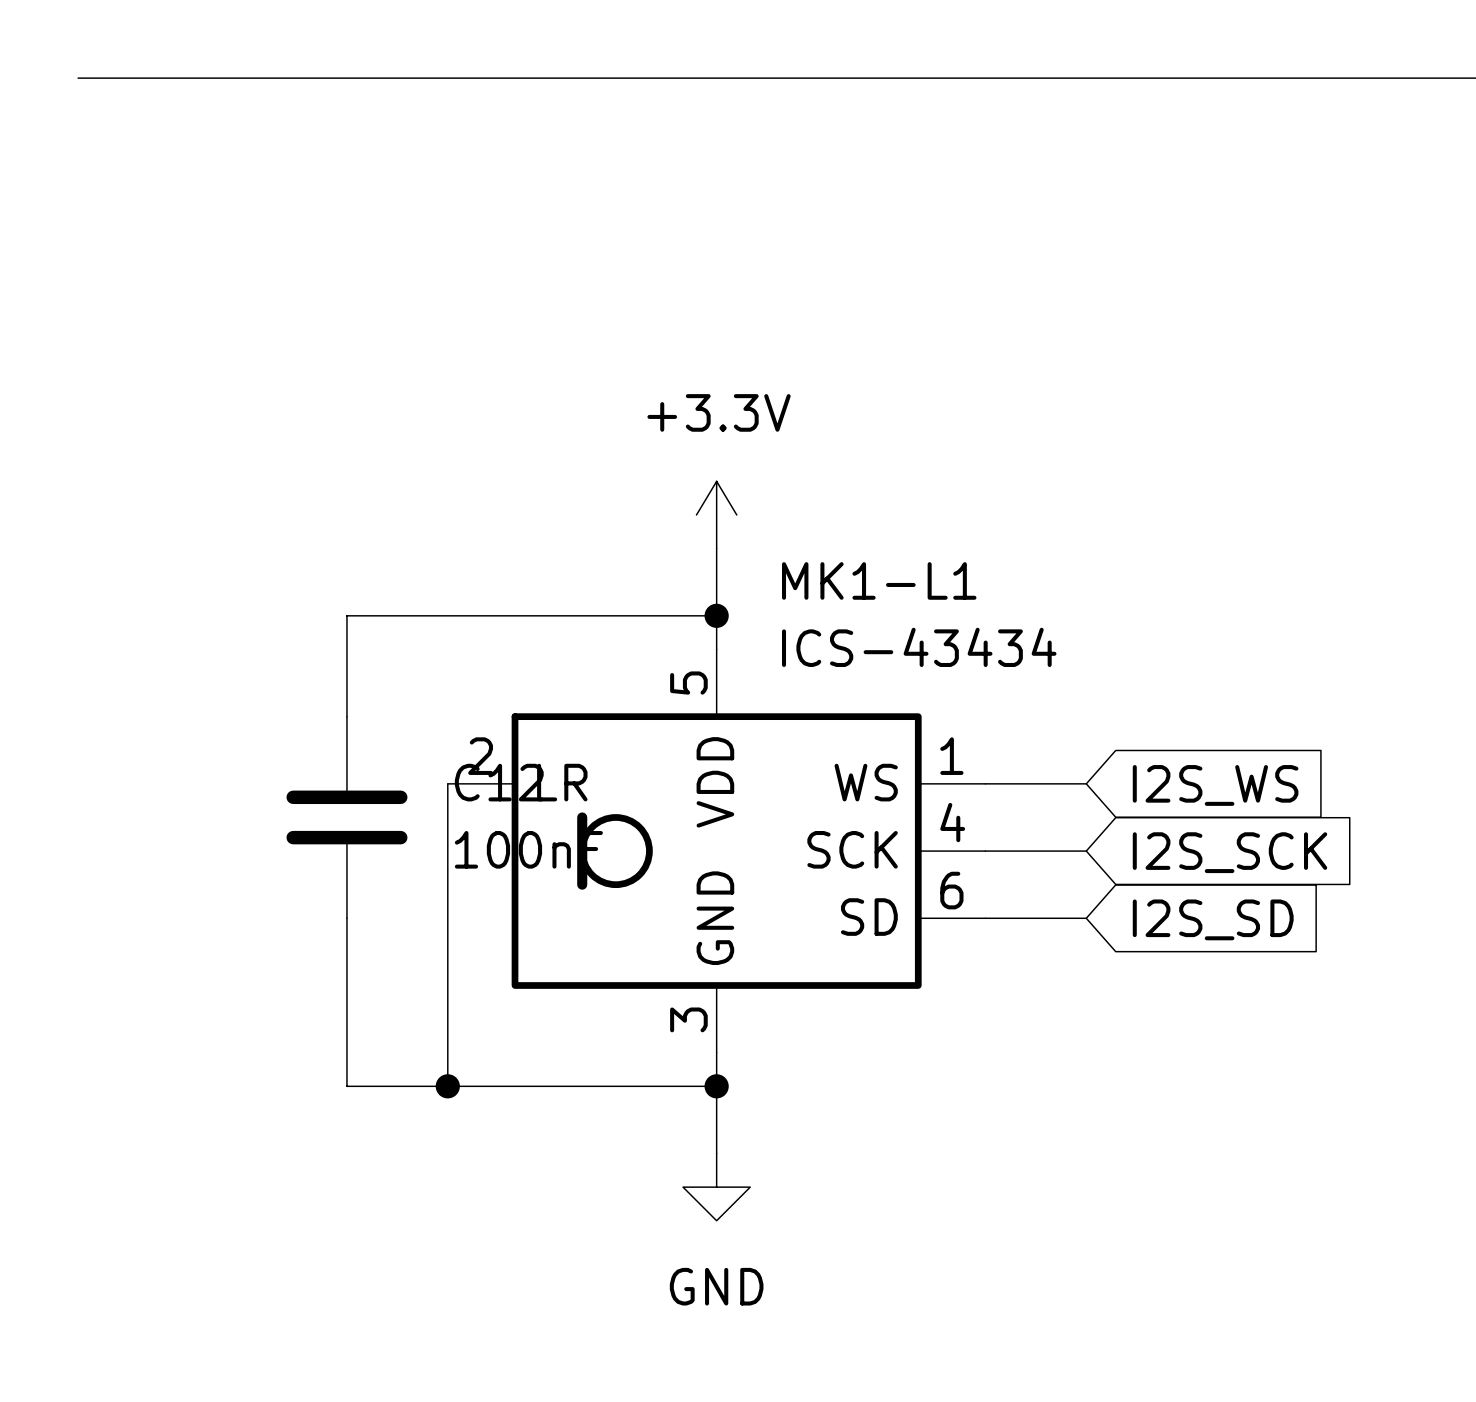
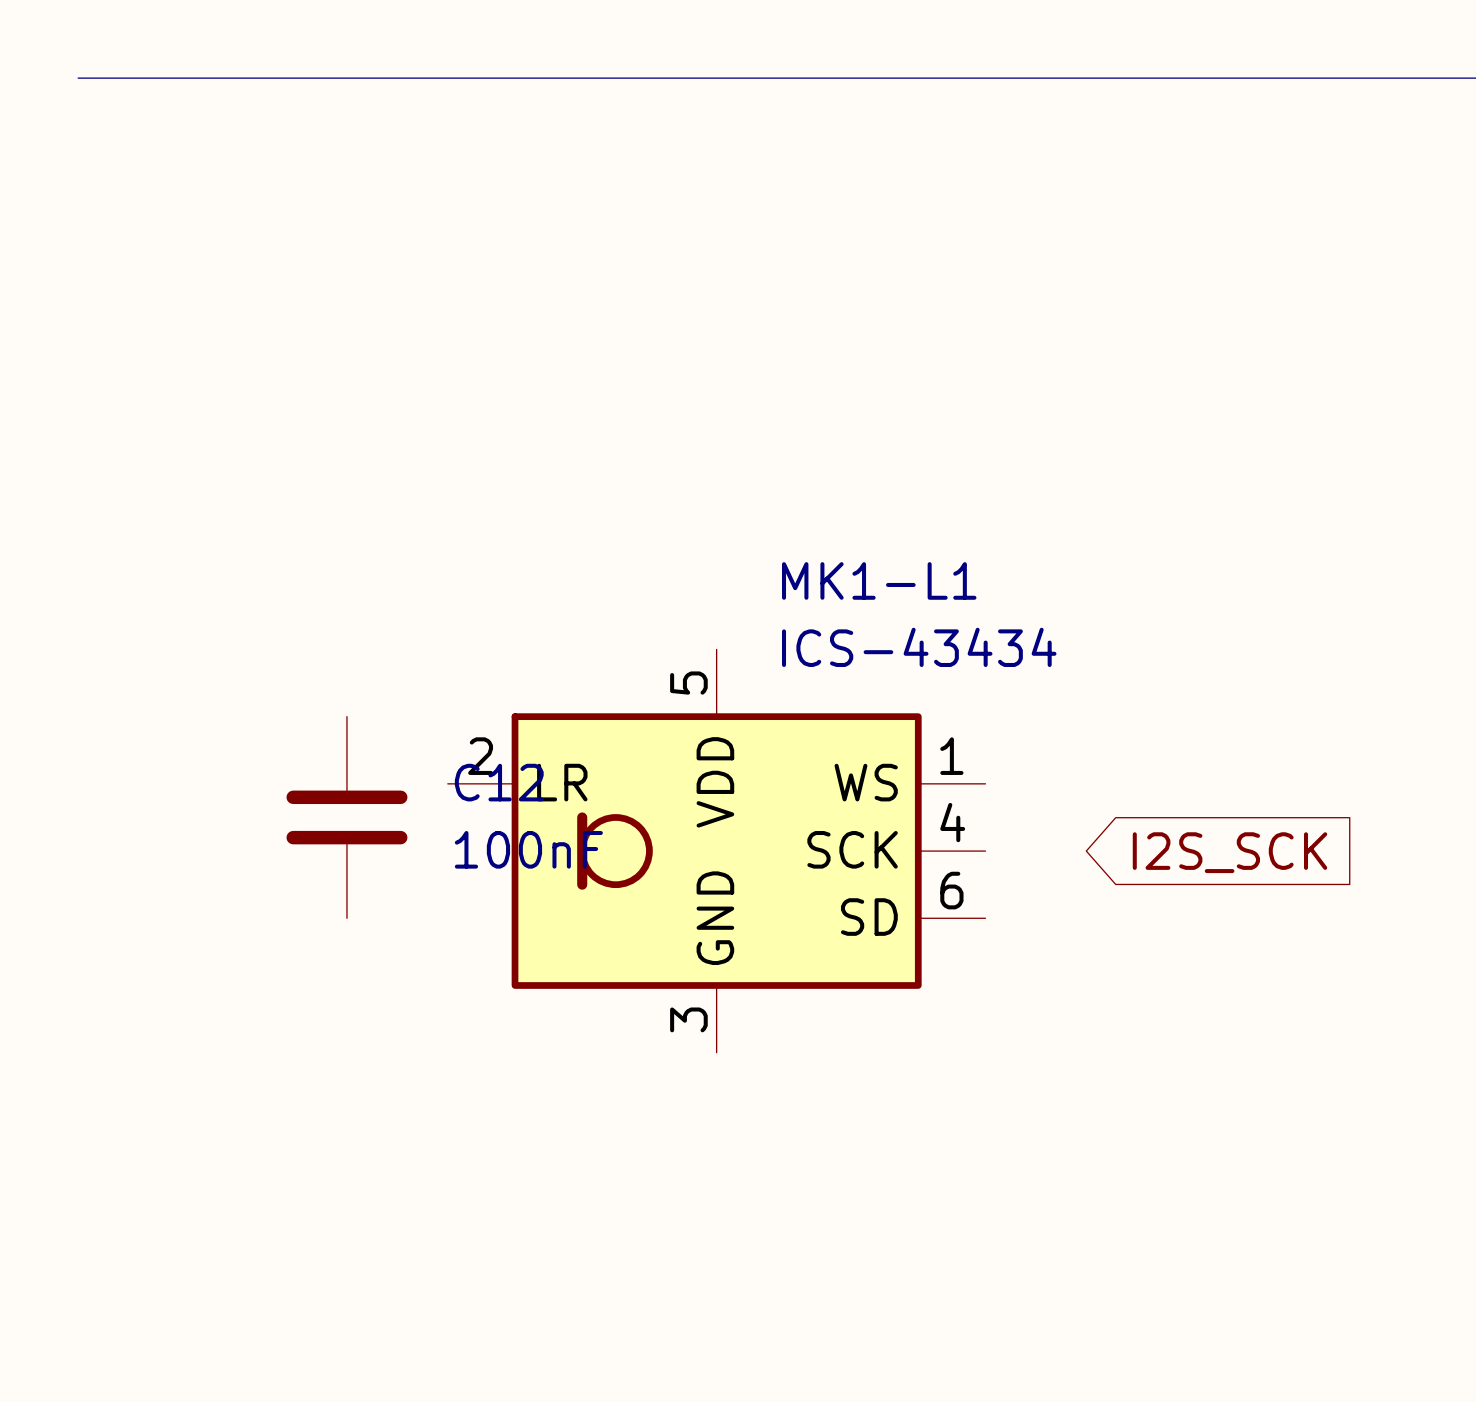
power symbol: +3.3V (716, 515) -> none
wire: (716, 548) (716, 649) -> none
wire: (716, 615) (346, 615) (346, 716) -> none
junction: (716, 615) -> none
wire: (447, 783) (447, 1086) -> none
wire: (985, 783) (1086, 783) -> none
global label: I2S_WS (1215, 785) -> none
wire: (985, 851) (1086, 851) -> none
wire: (346, 918) (346, 1086) (716, 1086) -> none
wire: (985, 918) (1086, 918) -> none
global label: I2S_SD (1213, 919) -> none
wire: (716, 1052) (716, 1153) -> none
junction: (447, 1086) -> none
junction: (716, 1086) -> none
power symbol: GND (716, 1187) -> none

